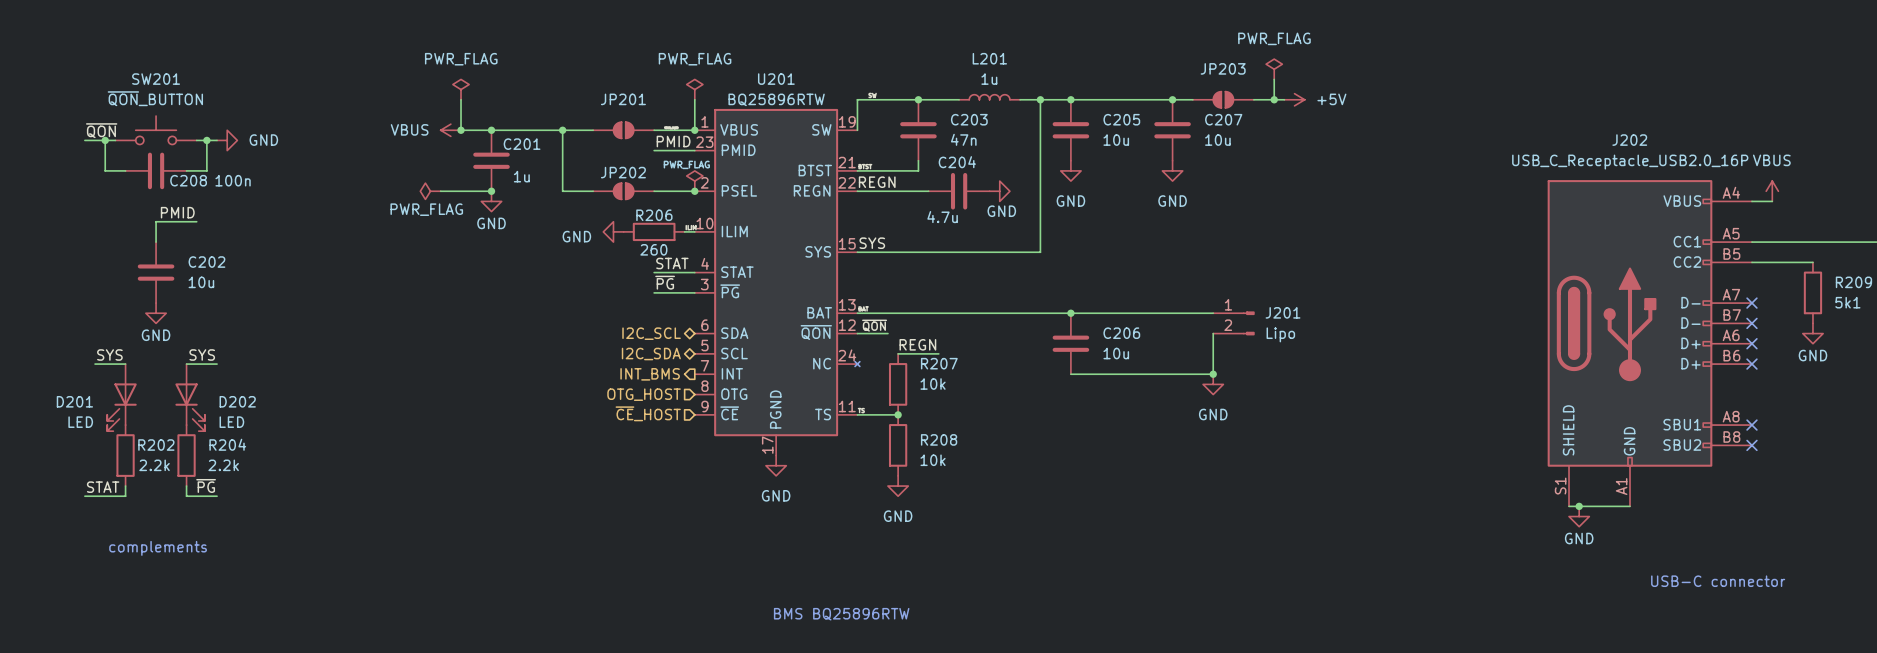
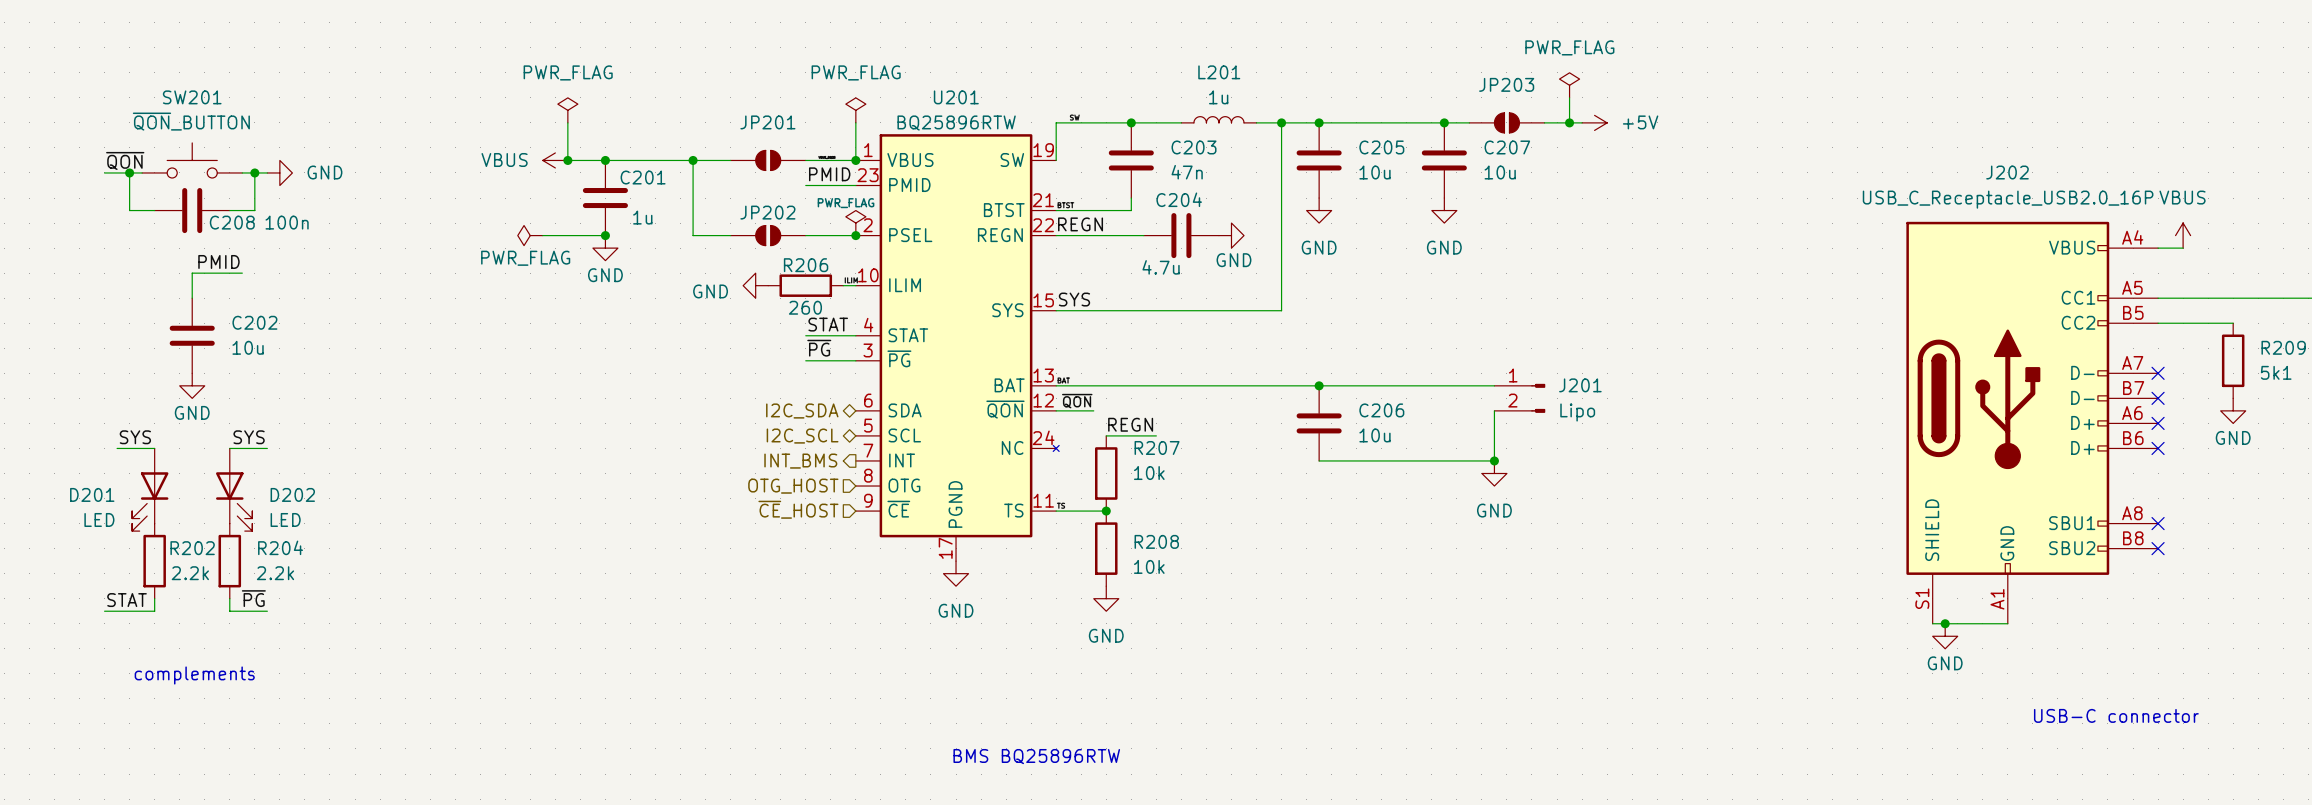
hierarchical label: I2C_SCL (651, 333) -> I2C_SDA (802, 411)
hierarchical label: I2C_SDA (651, 354) -> I2C_SCL (802, 436)

